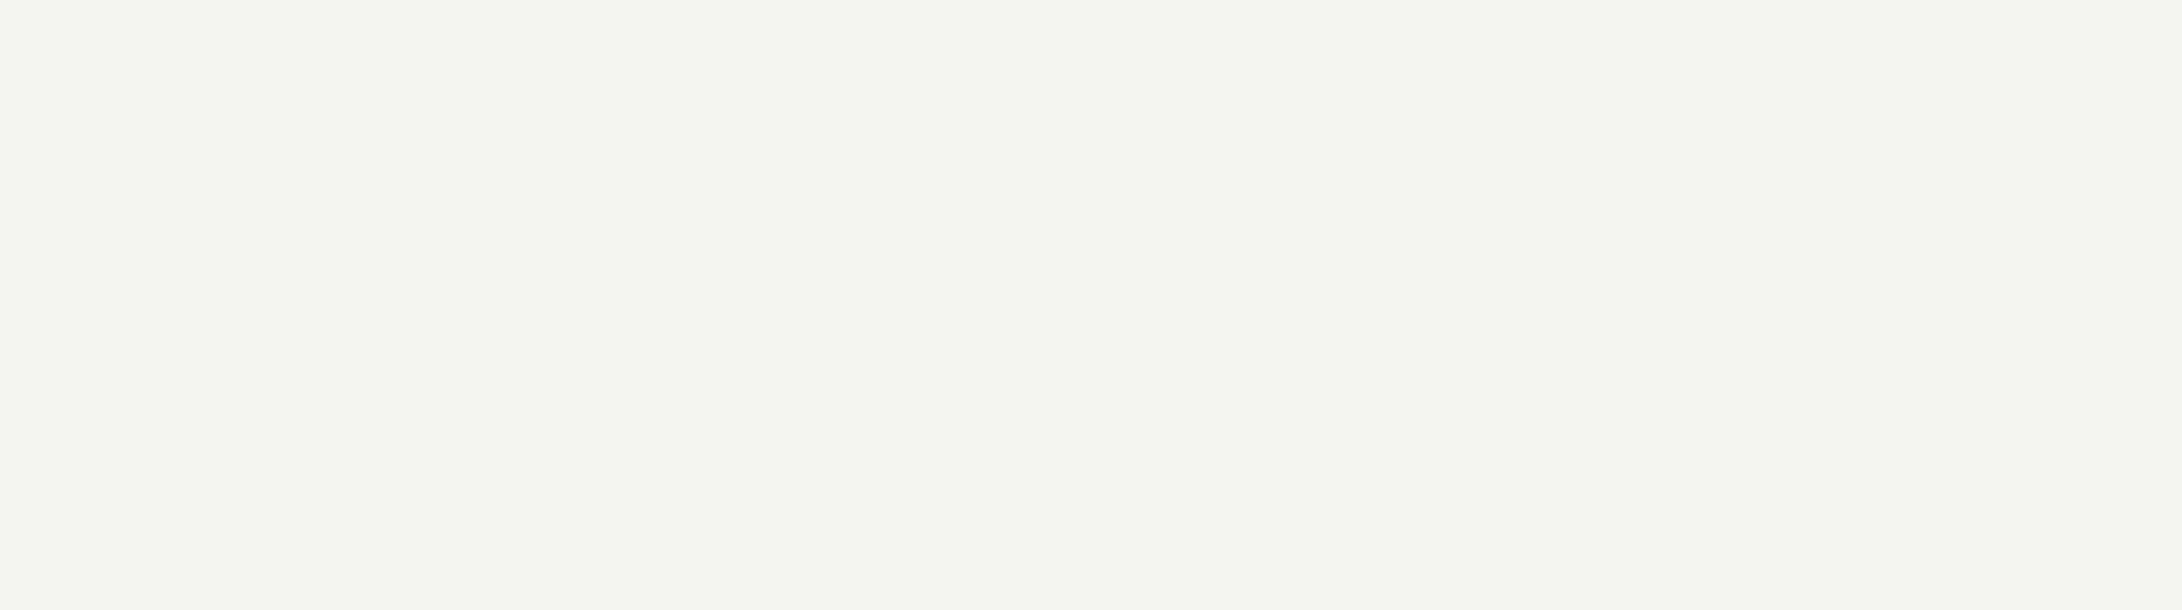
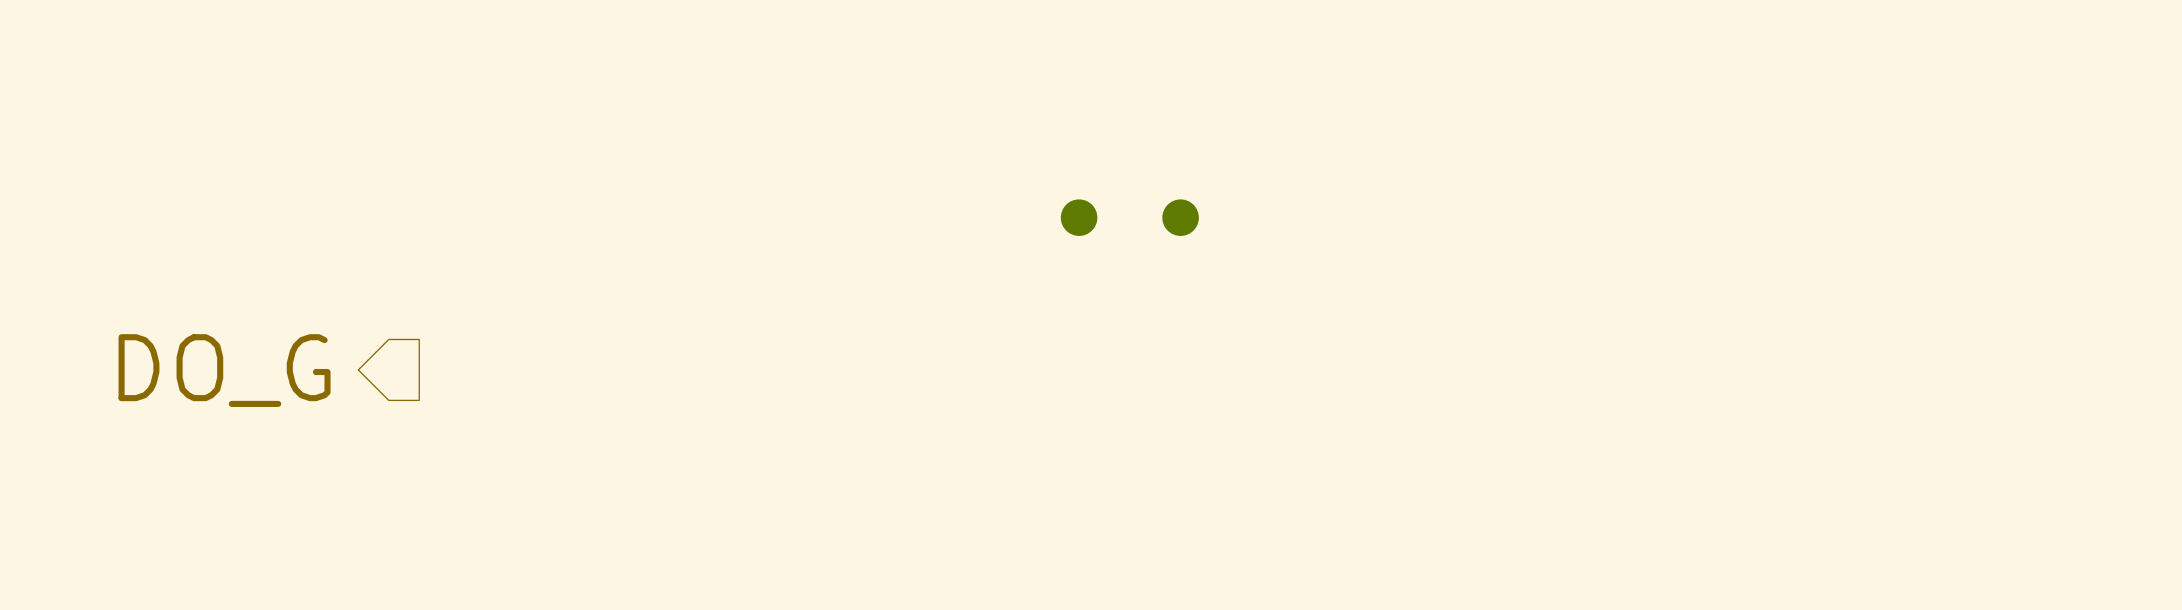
junction: none -> (1079, 217)
junction: none -> (1180, 217)
hierarchical label: none -> DO_G (224, 370)

